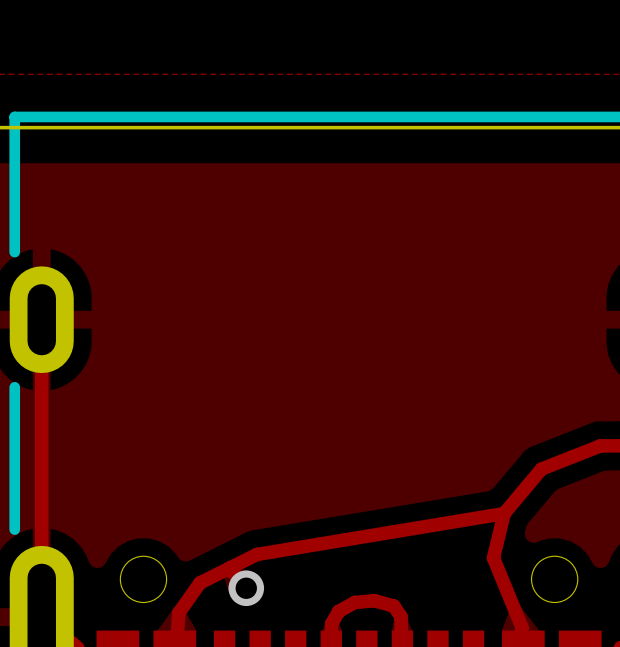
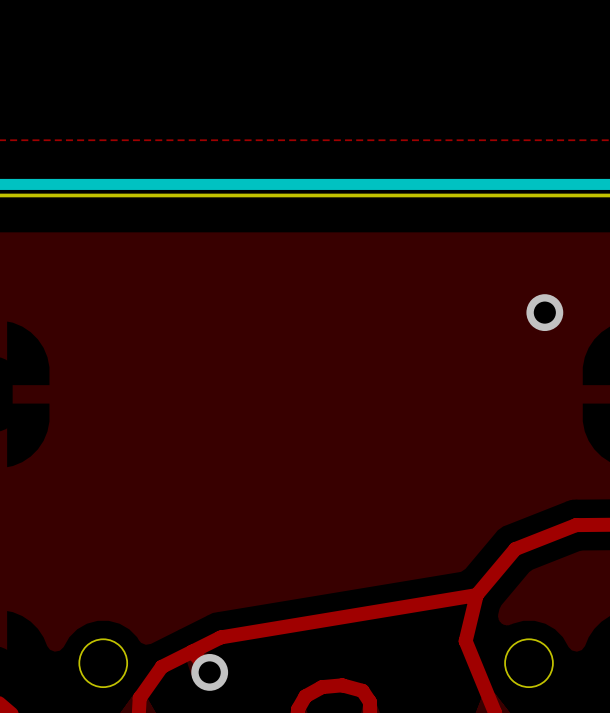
via: none -> (544, 312)

